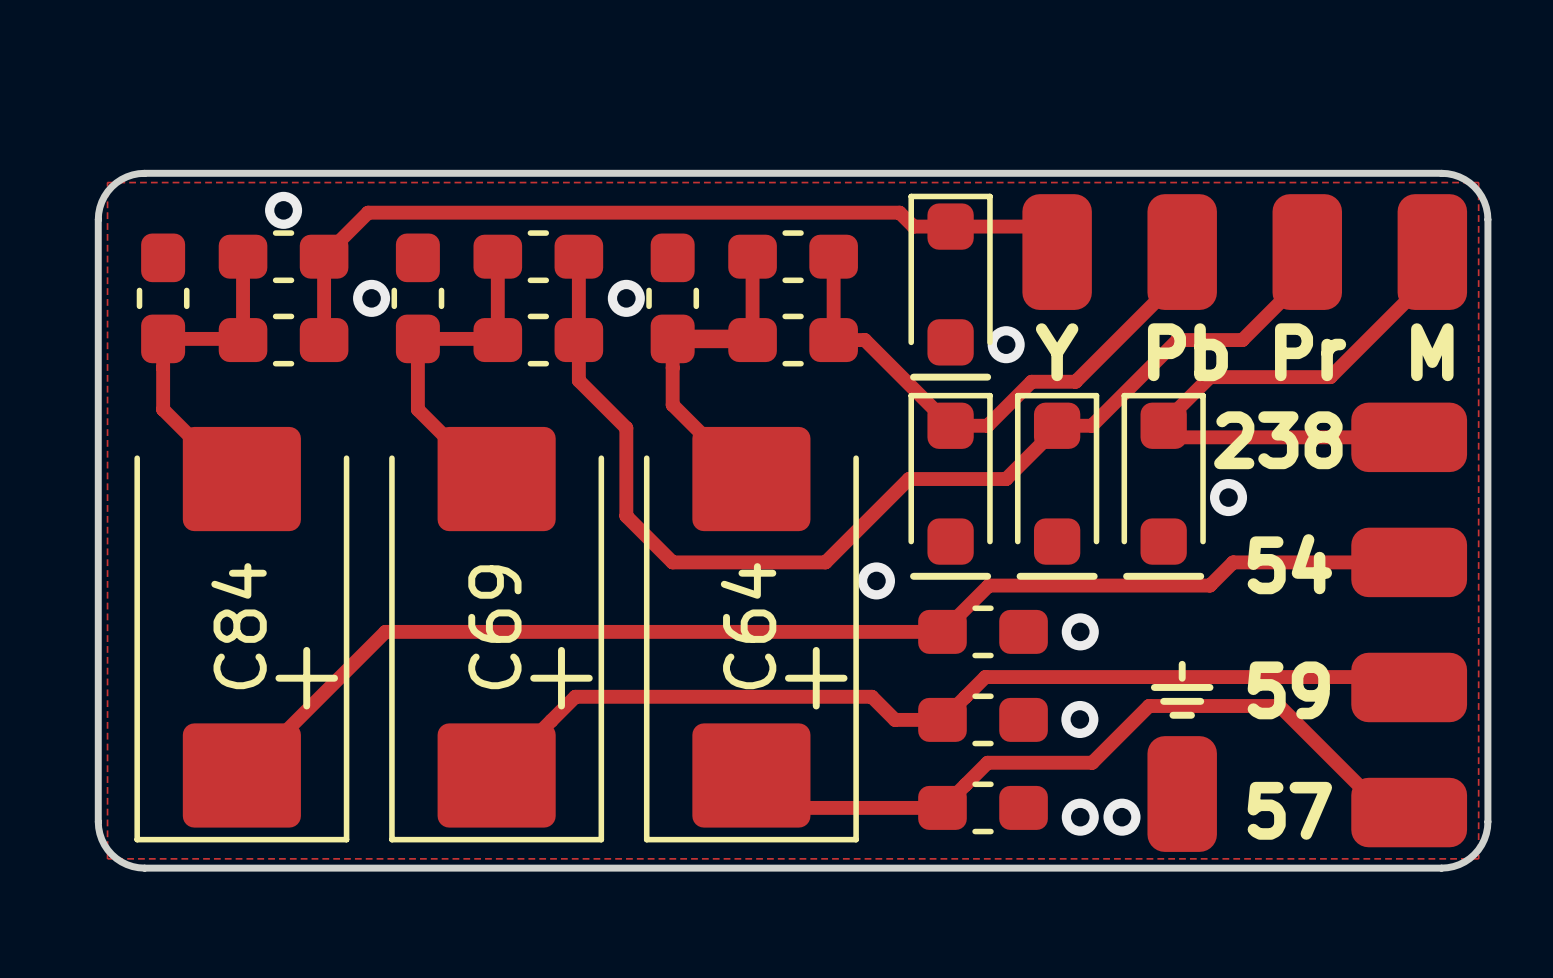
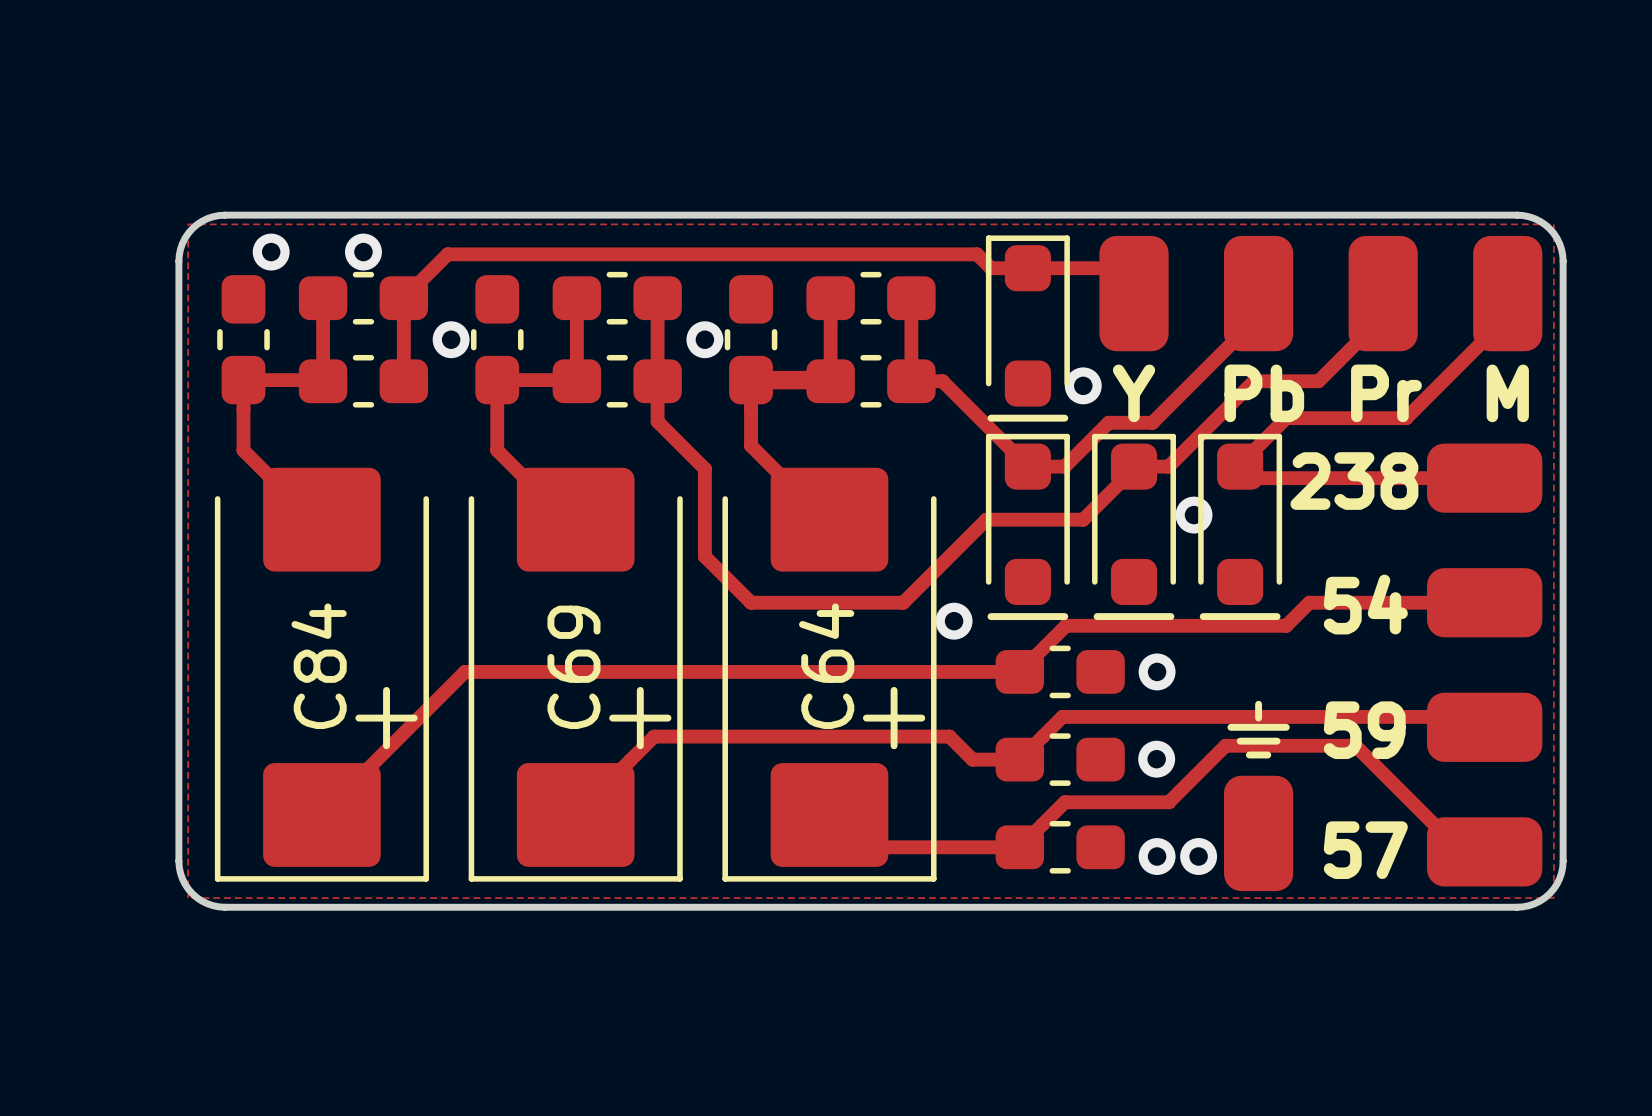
via: none -> (271, 252)
via position: (1228, 497) -> (1194, 515)

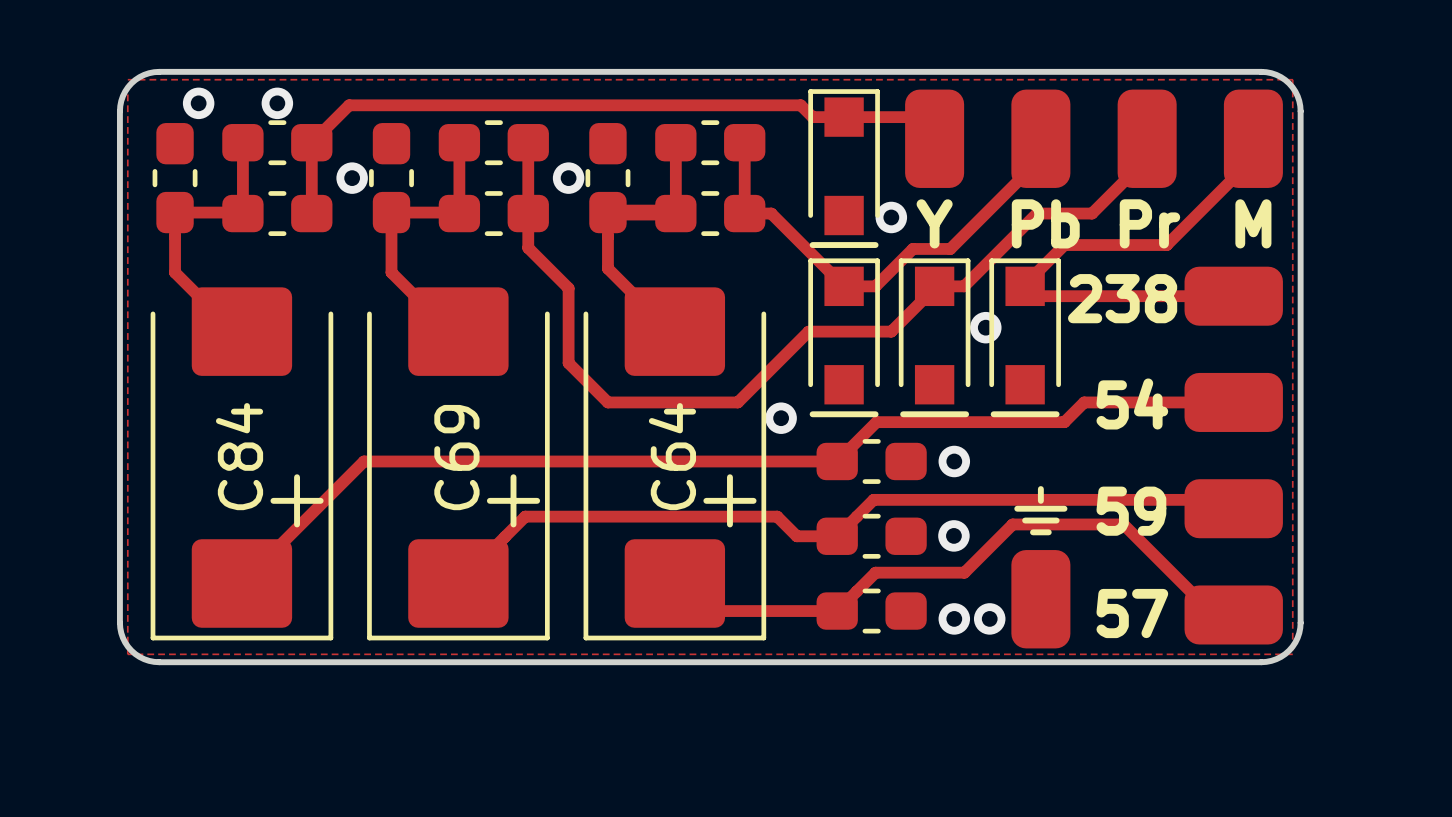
part footprint: [985, 235, 1070, 407] -> [808, 89, 880, 236]
part footprint: [985, 433, 1070, 606] -> [808, 258, 880, 405]
part footprint: [1092, 433, 1177, 606] -> [898, 258, 971, 405]
part footprint: [1198, 433, 1283, 606] -> [989, 258, 1061, 405]

